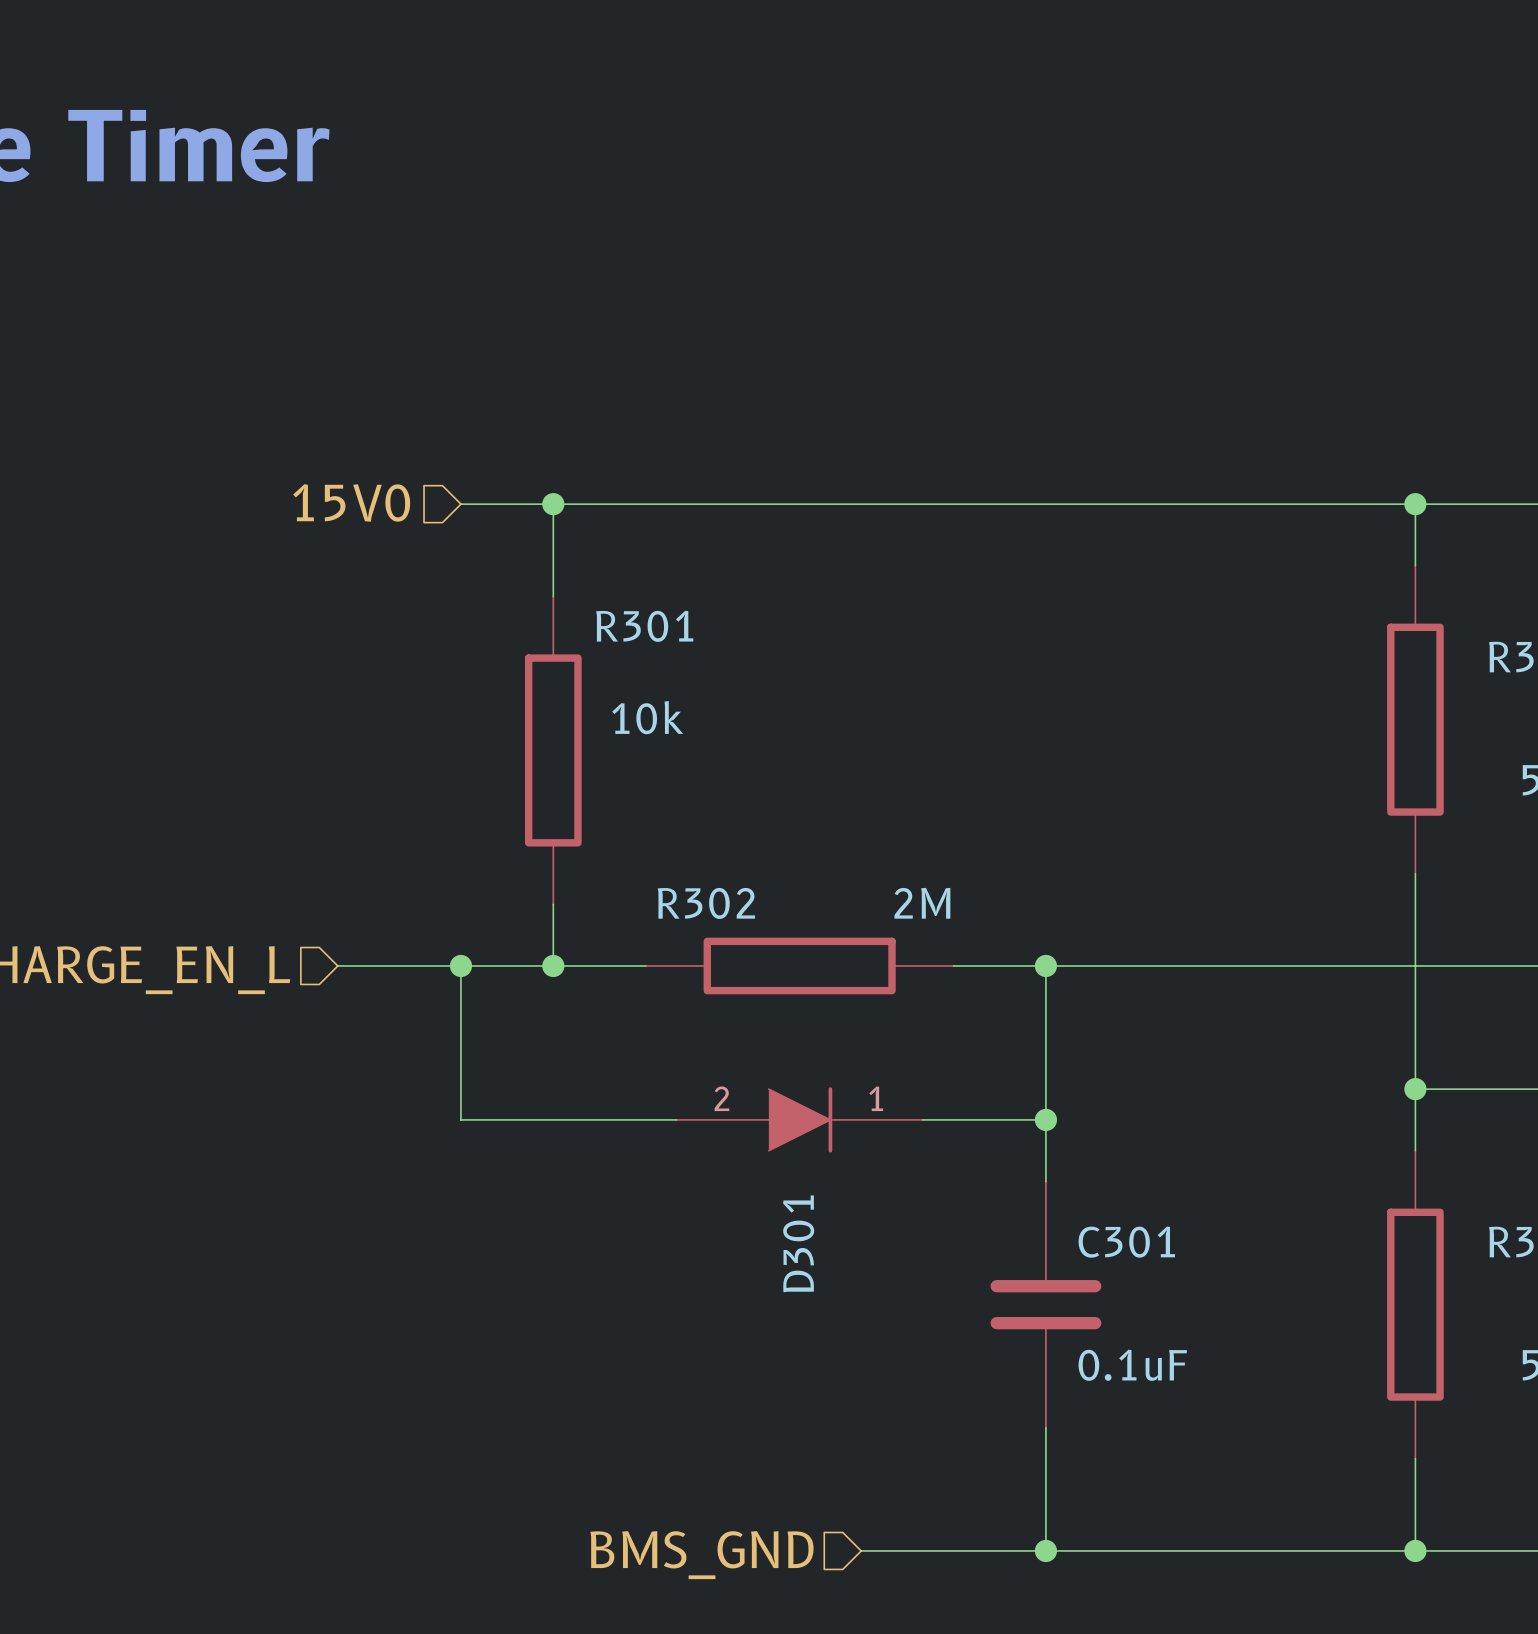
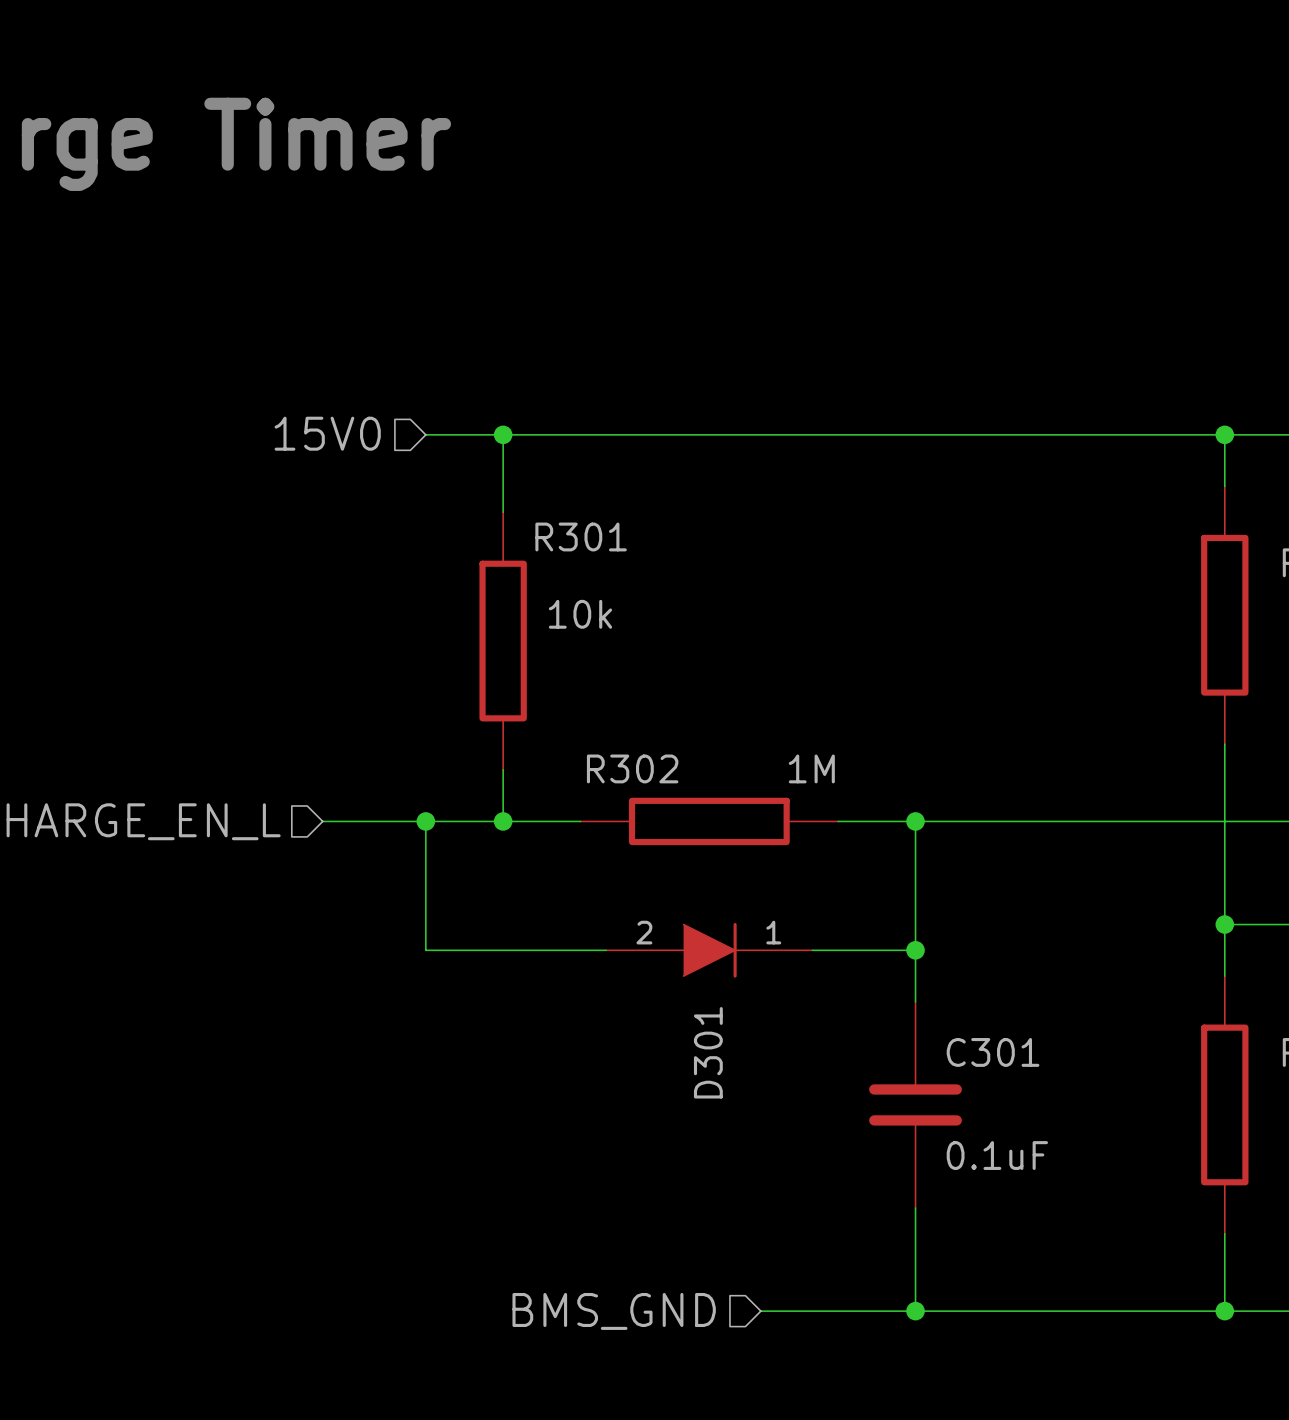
R302 value: 2M (922, 903) -> 1M (811, 768)

